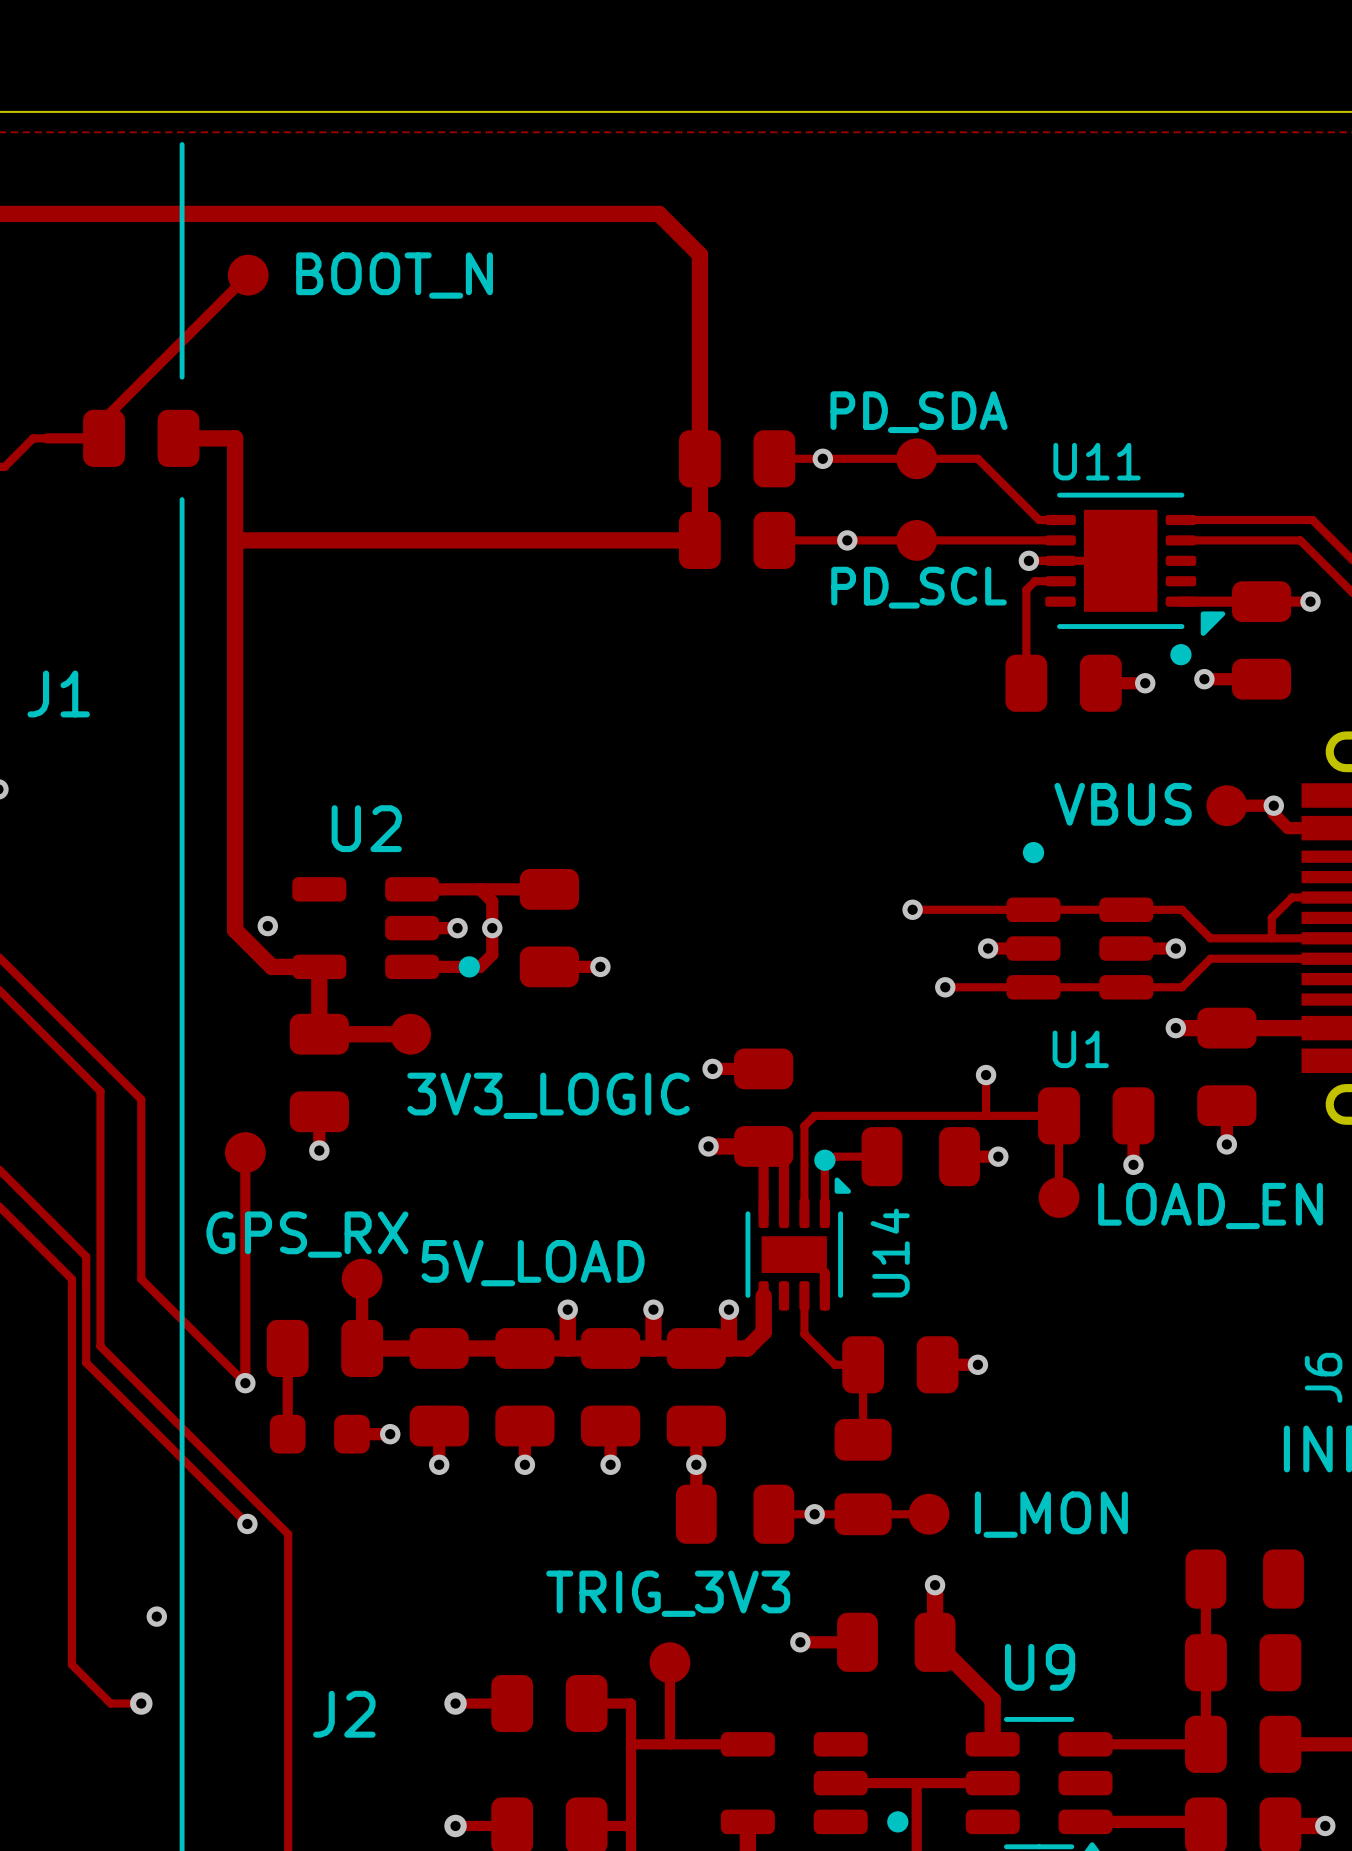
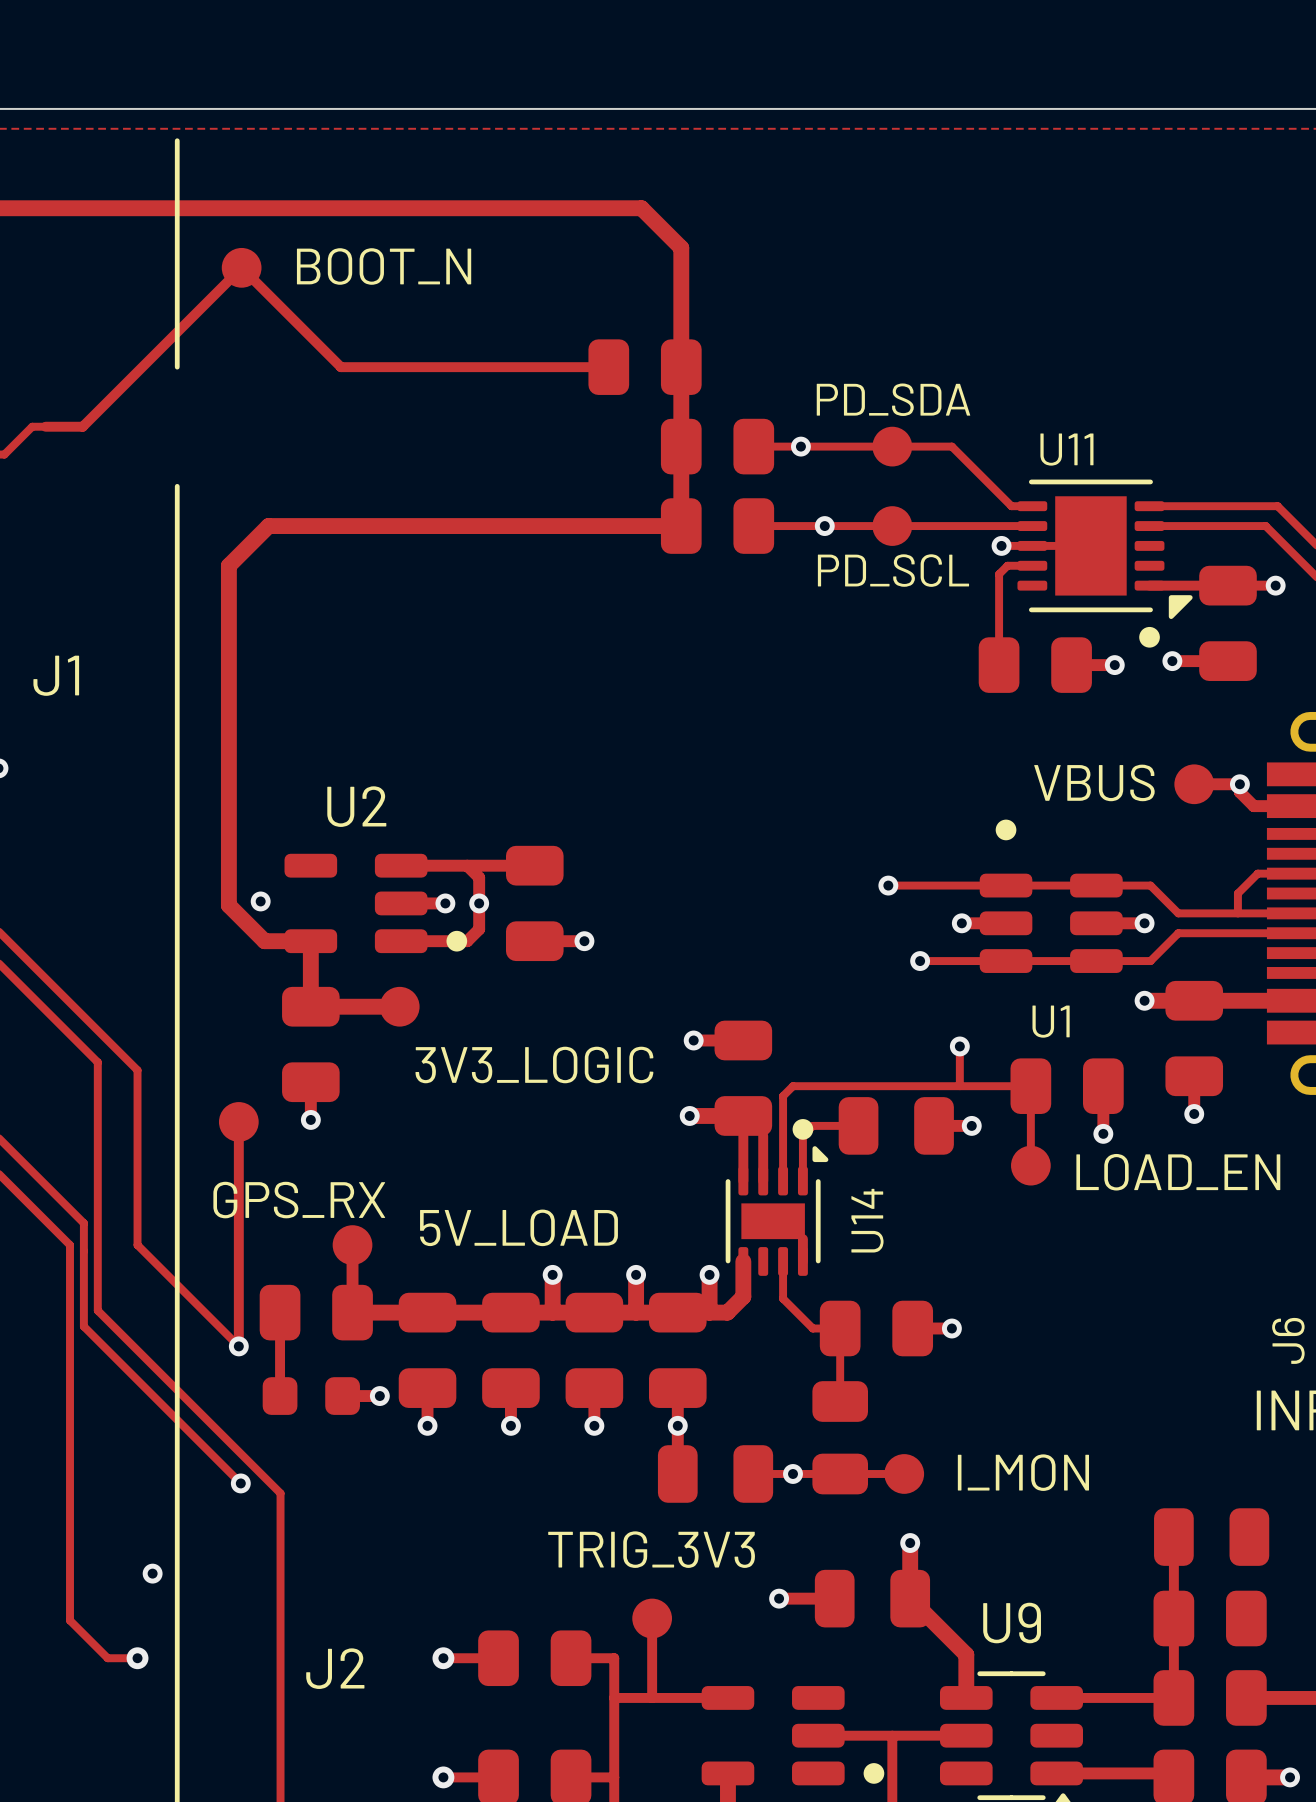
track: none -> (241, 267) (340, 367) (608, 367)
part position: (141, 438) -> (645, 367)
track: (178, 438) (235, 438) (235, 581) -> none
track: (235, 540) (275, 540) -> (228, 565) (268, 526)

